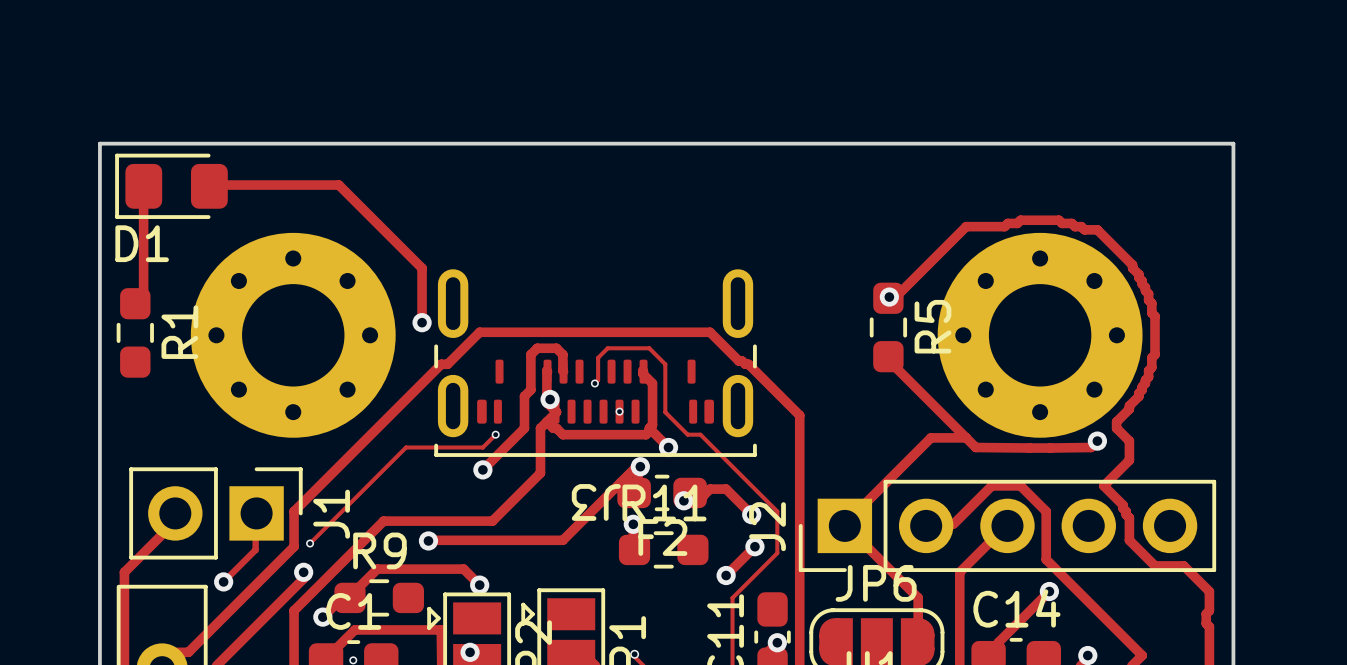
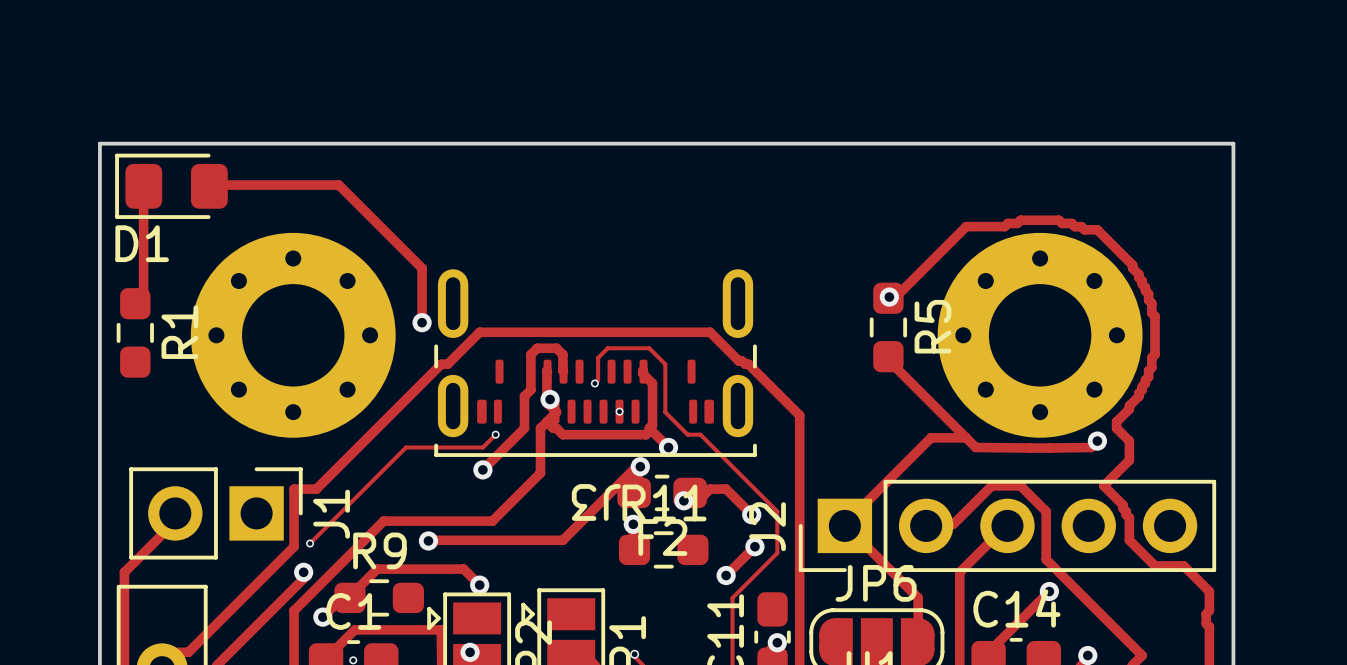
track: (316, 489) (294, 511) -> (316, 489) (294, 489) (294, 511)
track: (255, 514) (255, 549) (223, 581) -> none
via: (223, 581) -> none

